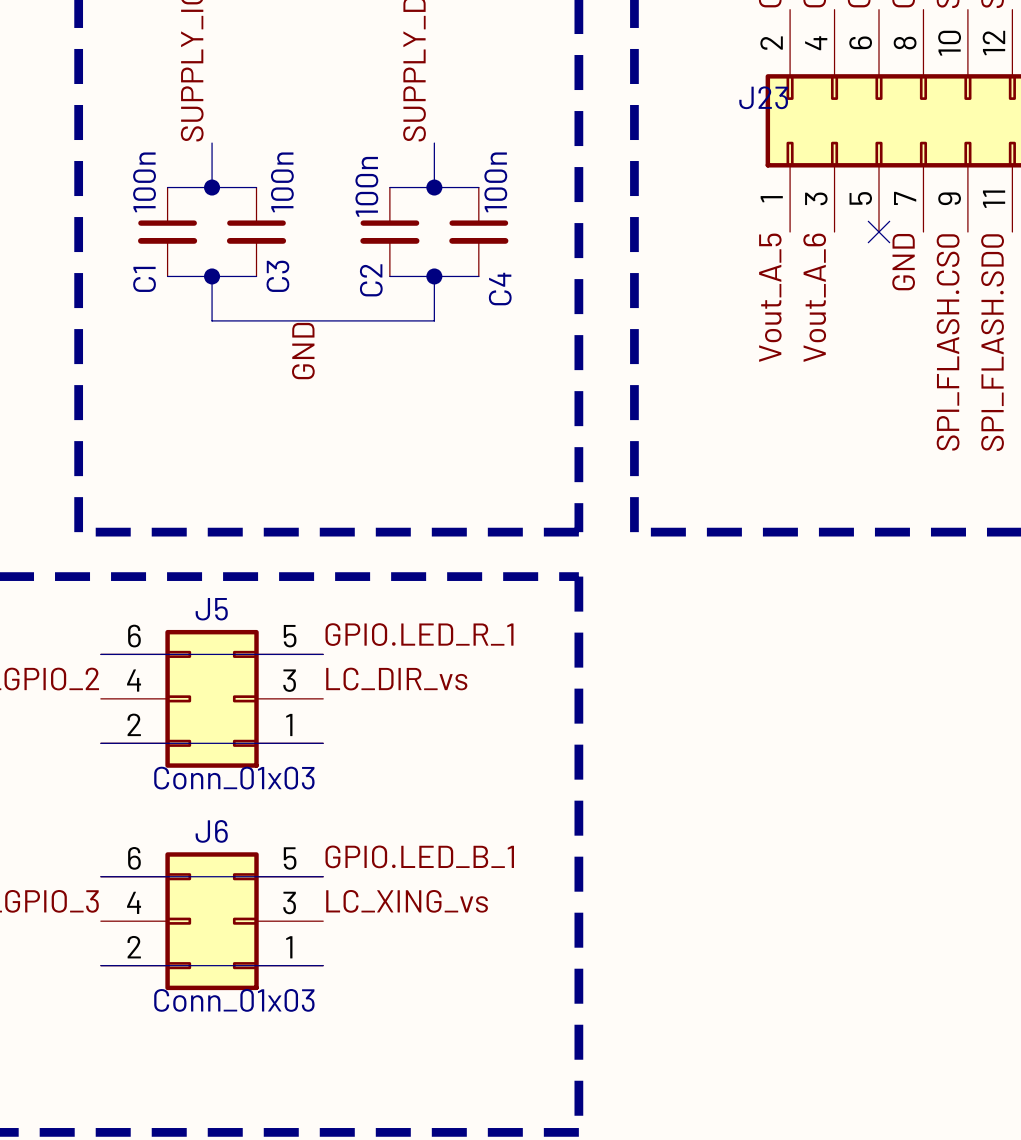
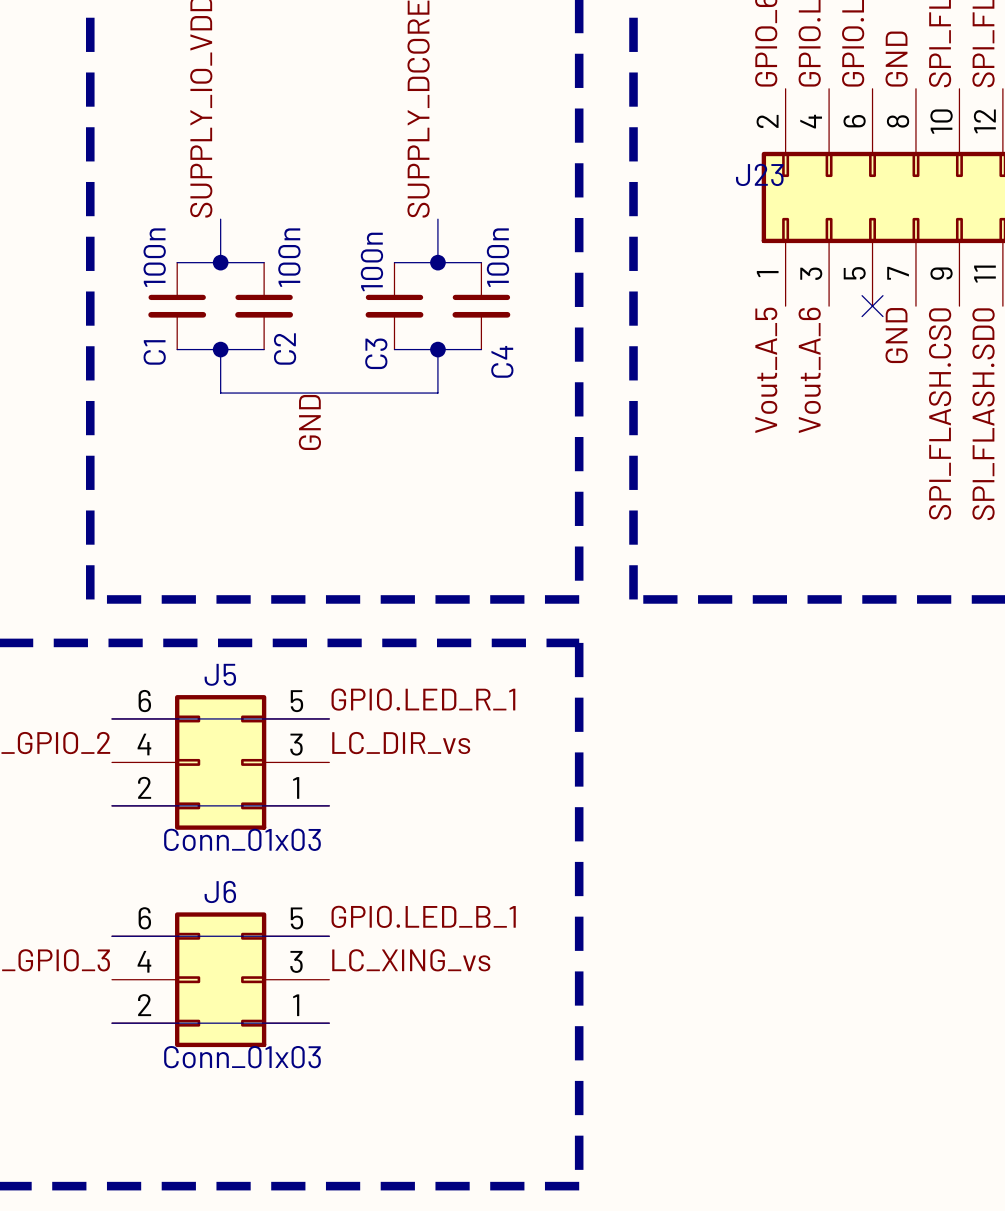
C3 name: C3 (277, 276) -> C2 (285, 348)
C2 name: C2 (371, 280) -> C3 (376, 353)

